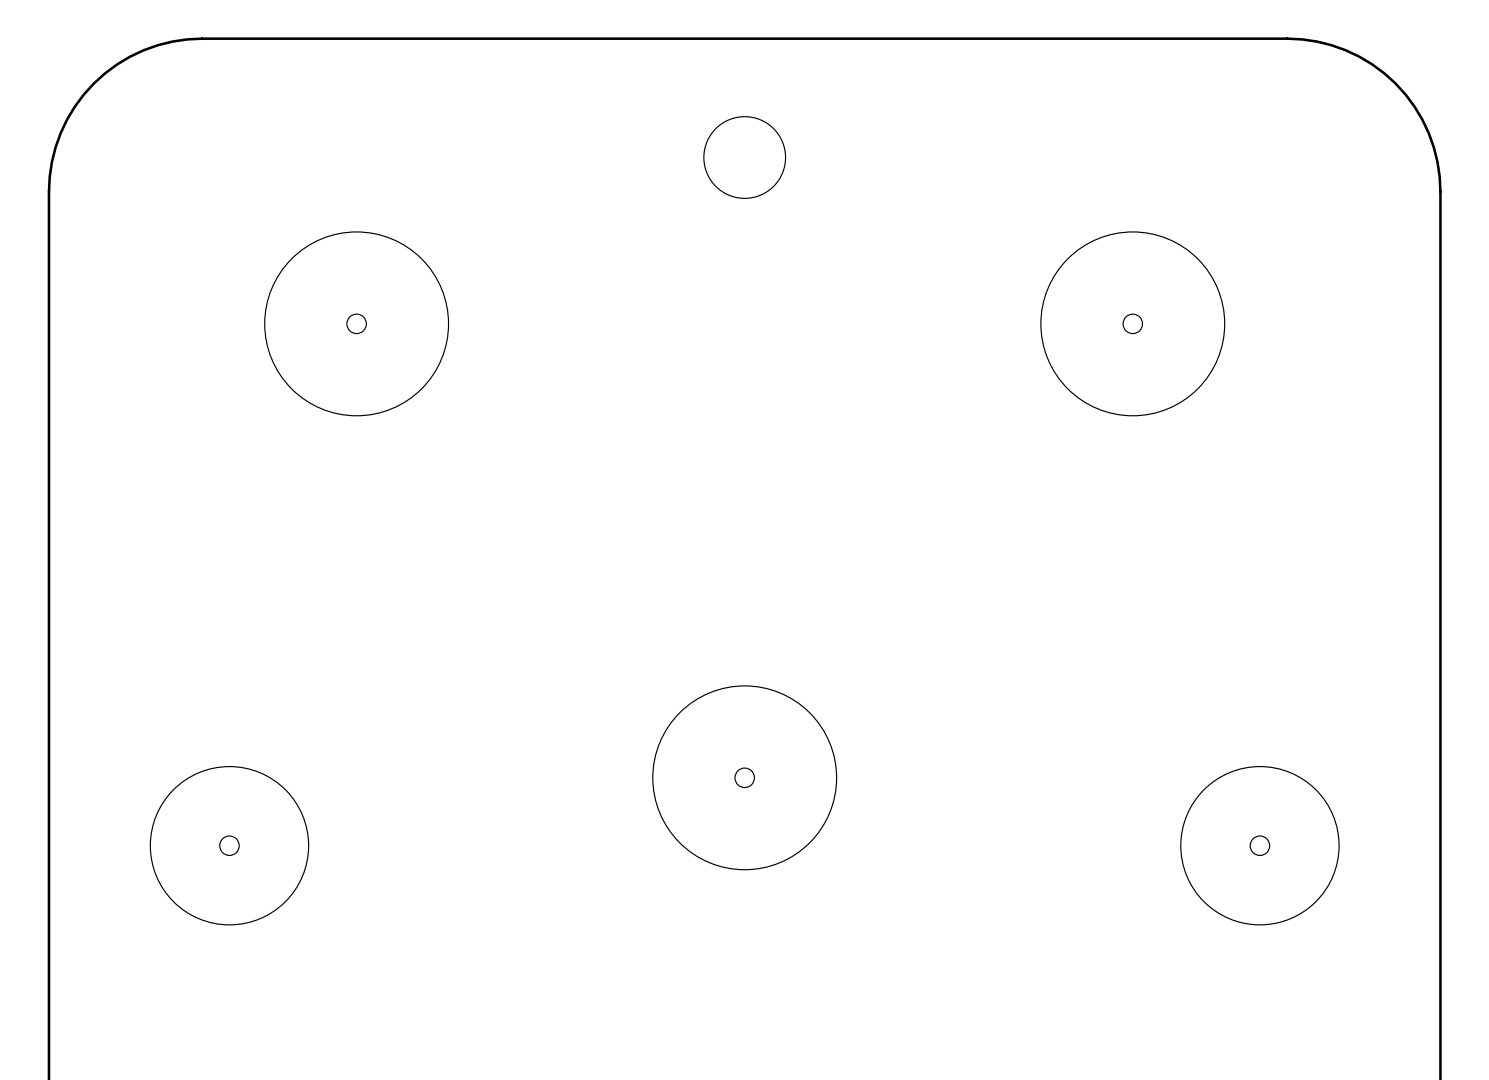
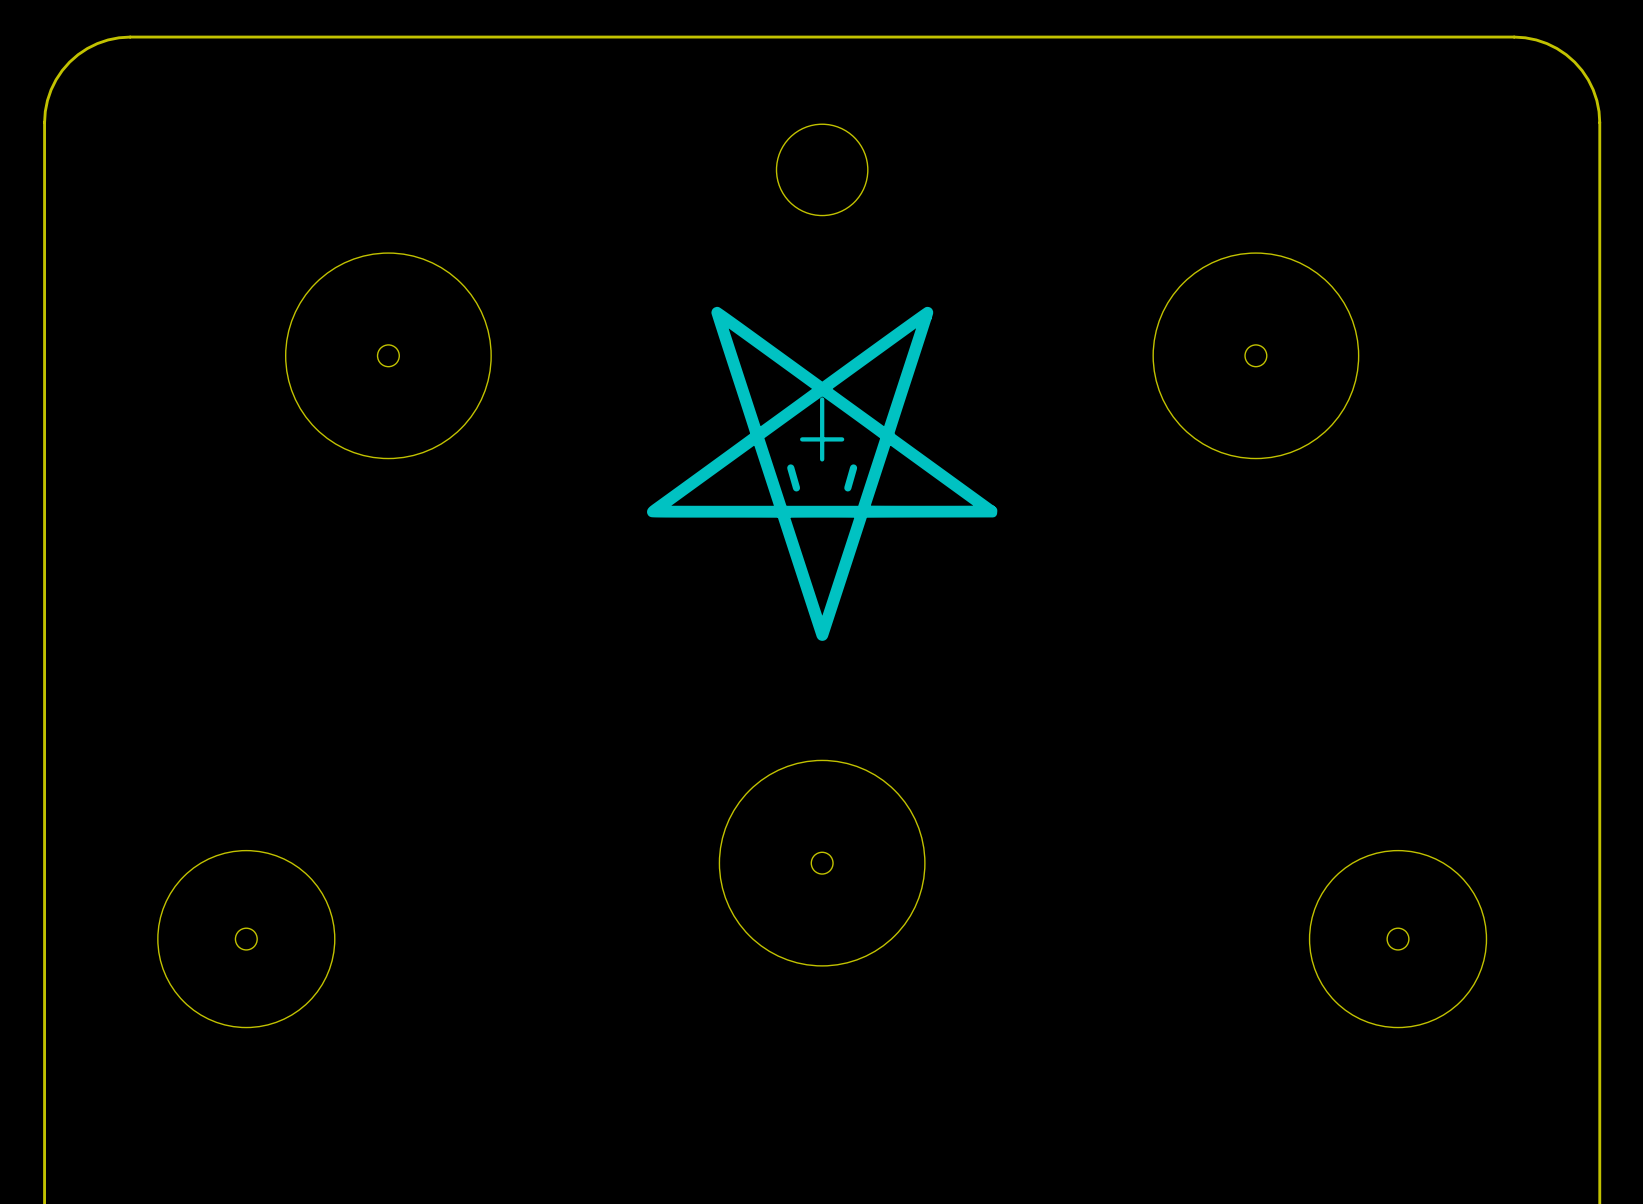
board edge: (202, 38) (172, 41) (143, 50) (117, 64) (93, 83) (74, 106) (60, 133) (51, 161) (48, 191) -> (215, 37) (118, 37) (97, 43) (69, 62) (56, 79) (45, 111) (44, 208)
board edge: (1287, 38) (1317, 41) (1345, 50) (1372, 64) (1395, 83) (1414, 106) (1428, 133) (1437, 161) (1440, 191) -> (1428, 37) (1525, 37) (1546, 43) (1574, 62) (1593, 89) (1599, 111) (1599, 208)
drawing: none -> [647, 306, 998, 641]

